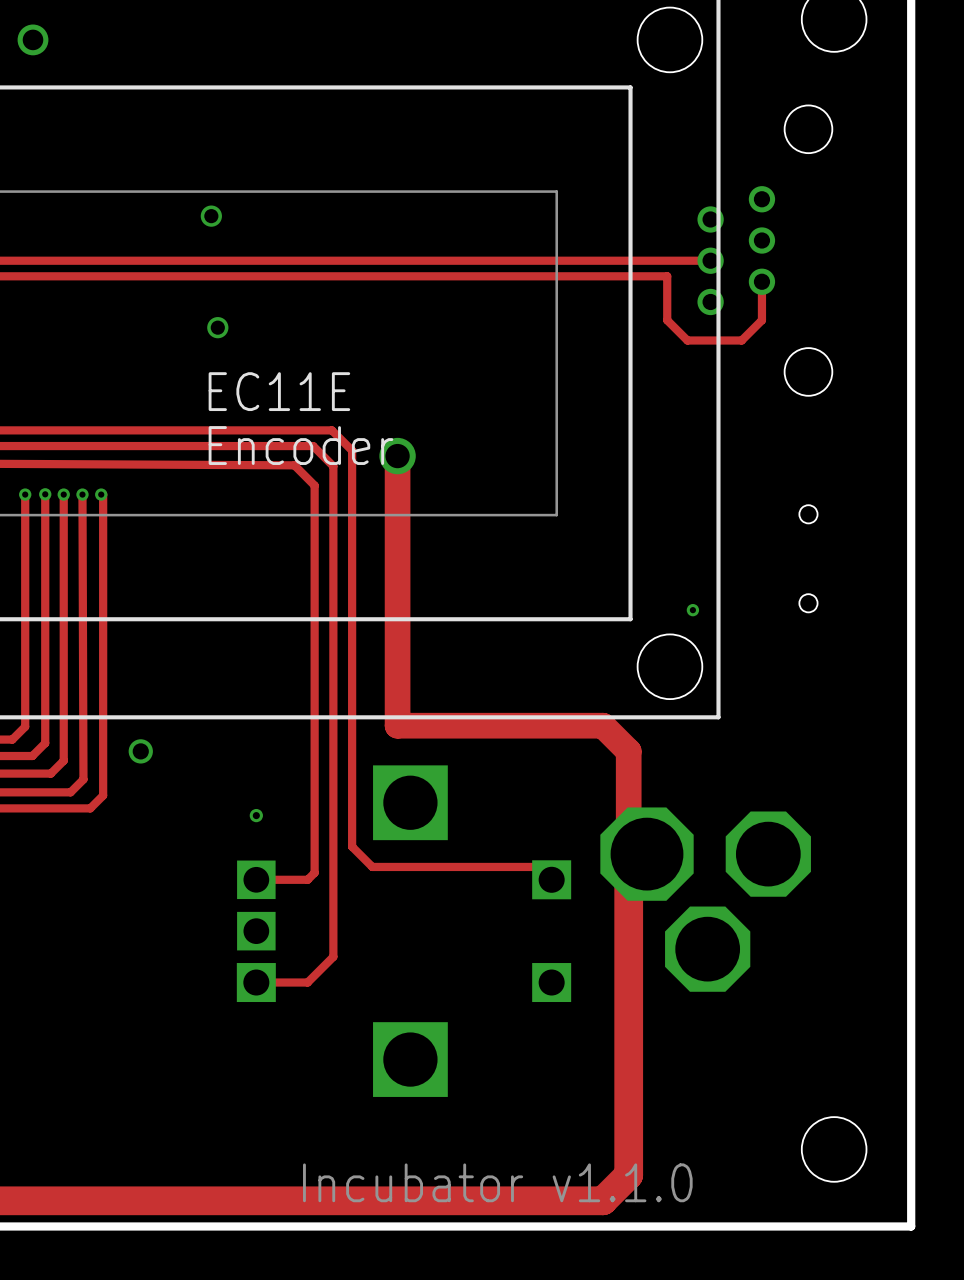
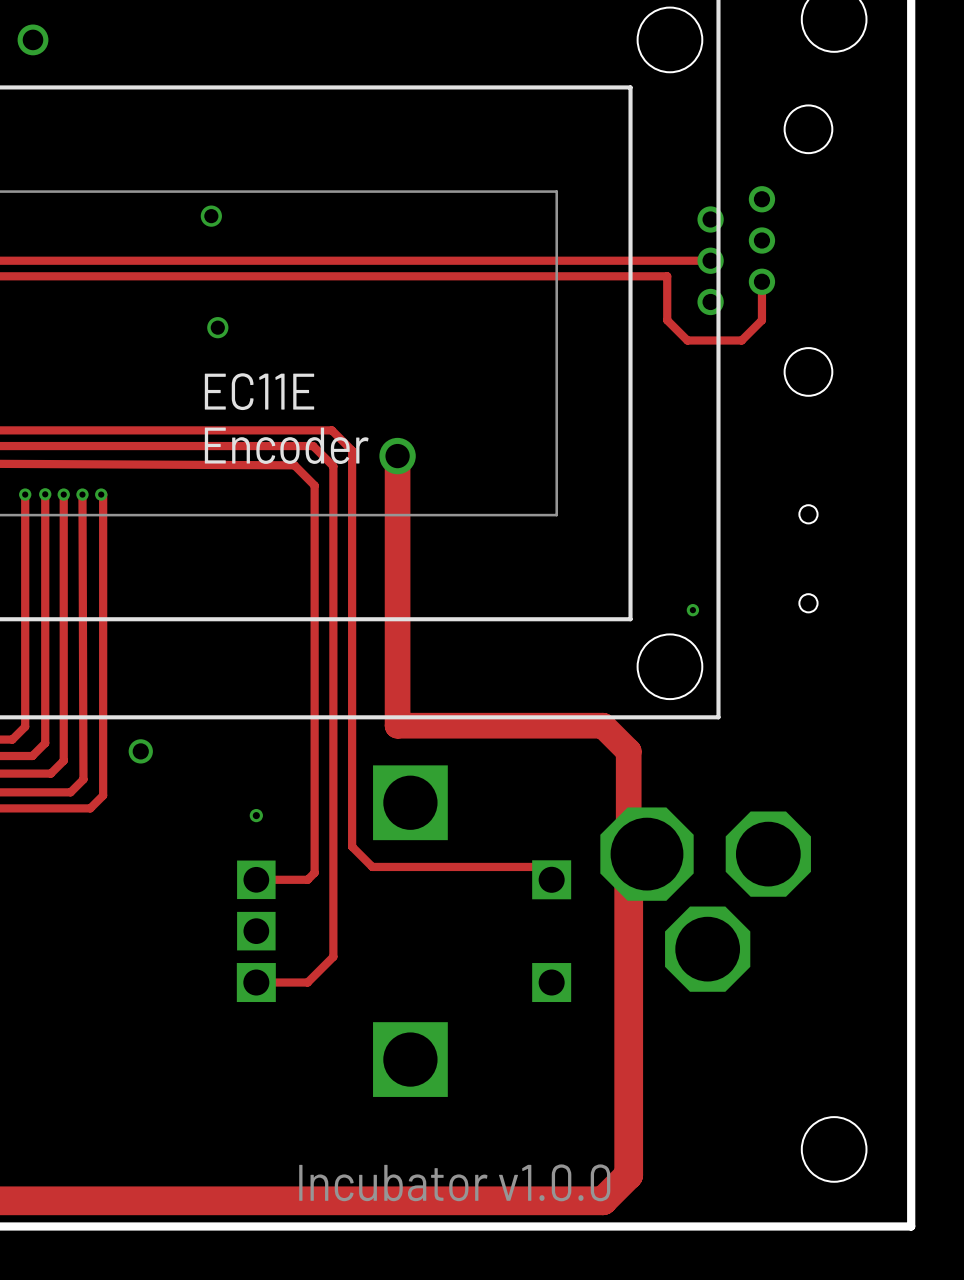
text: Incubator v1.1.0 (497, 1182) -> Incubator v1.0.0 (454, 1182)

